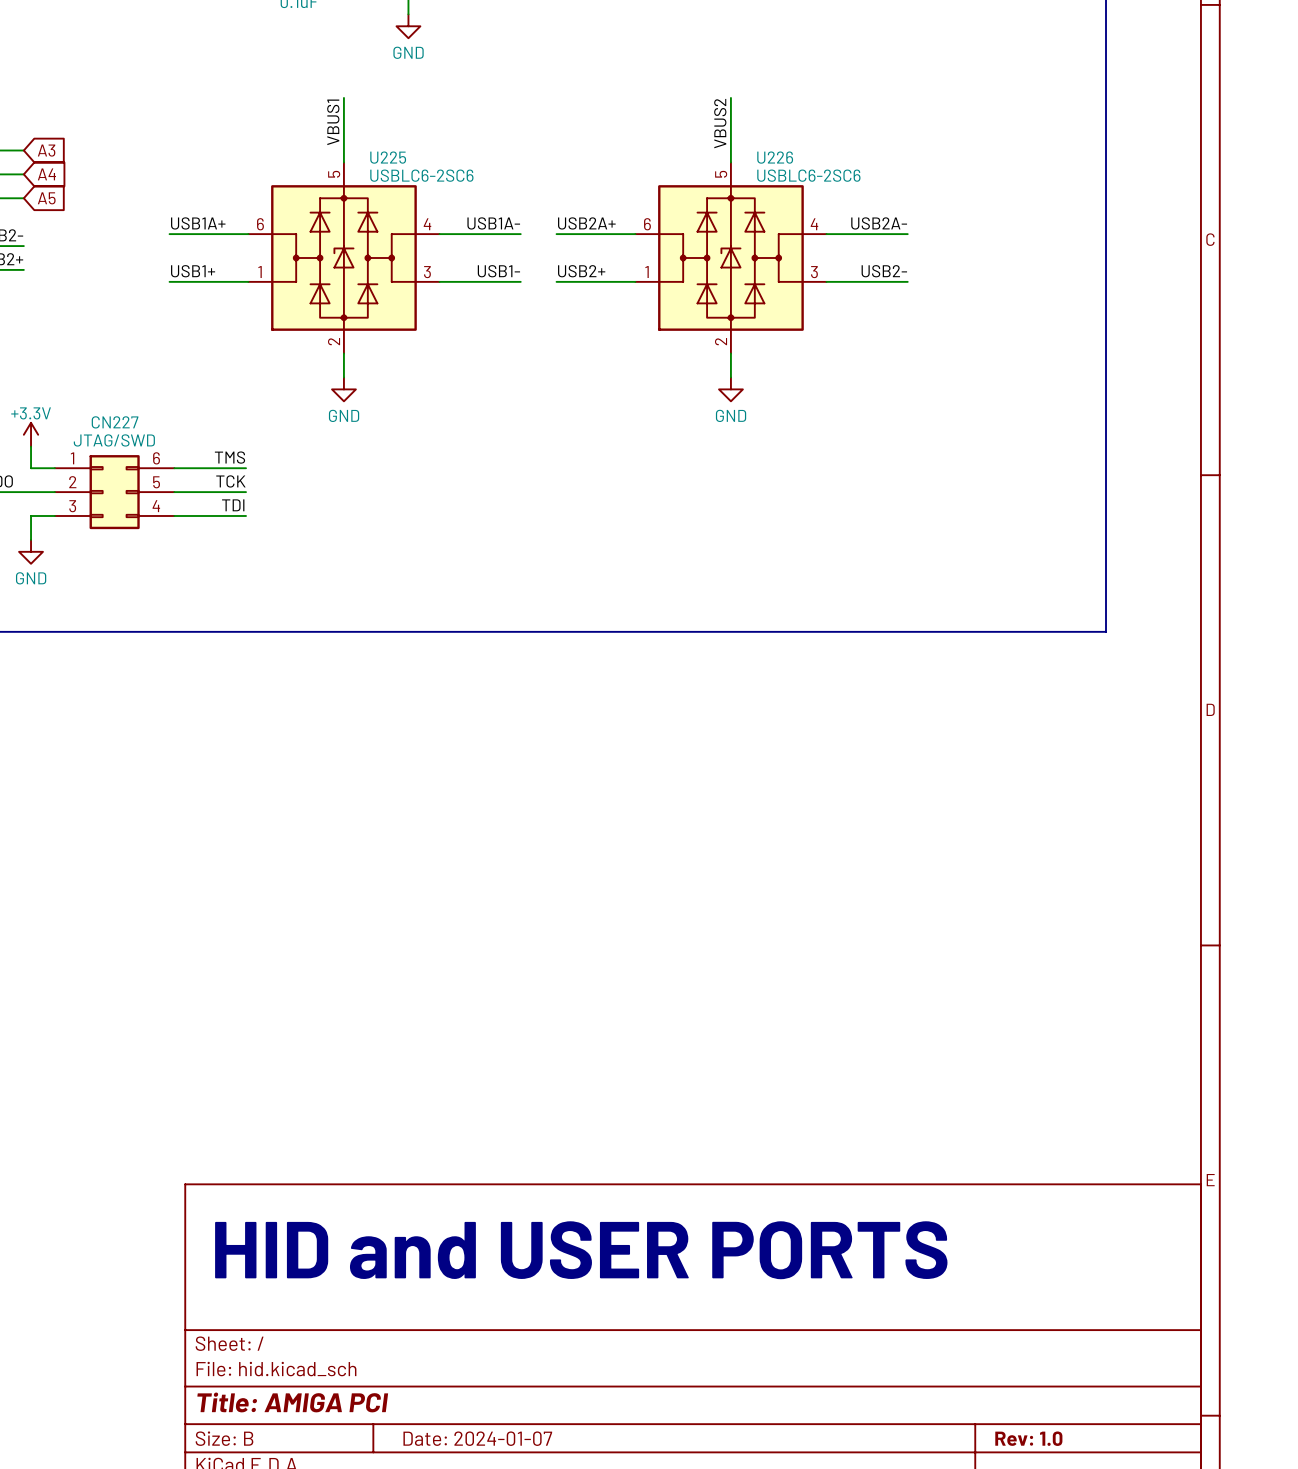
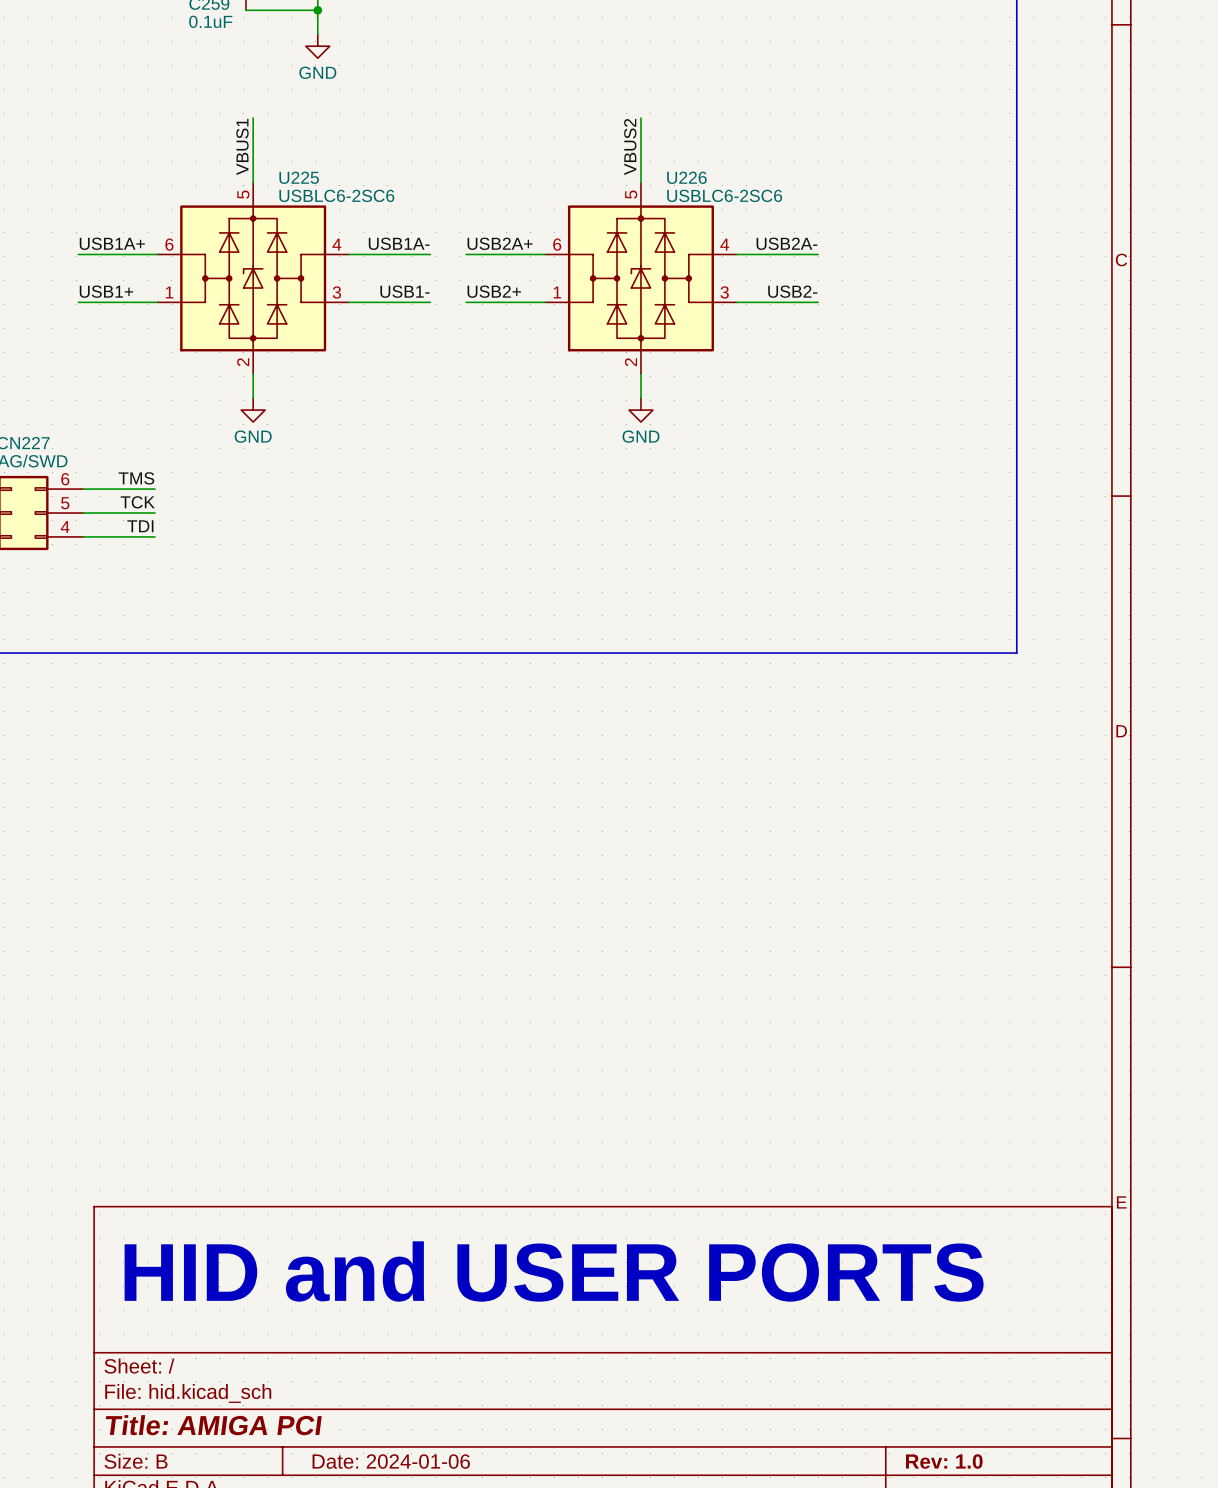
title block: Date: 2024-01-07 (477, 1438) -> Date: 2024-01-06 (391, 1461)

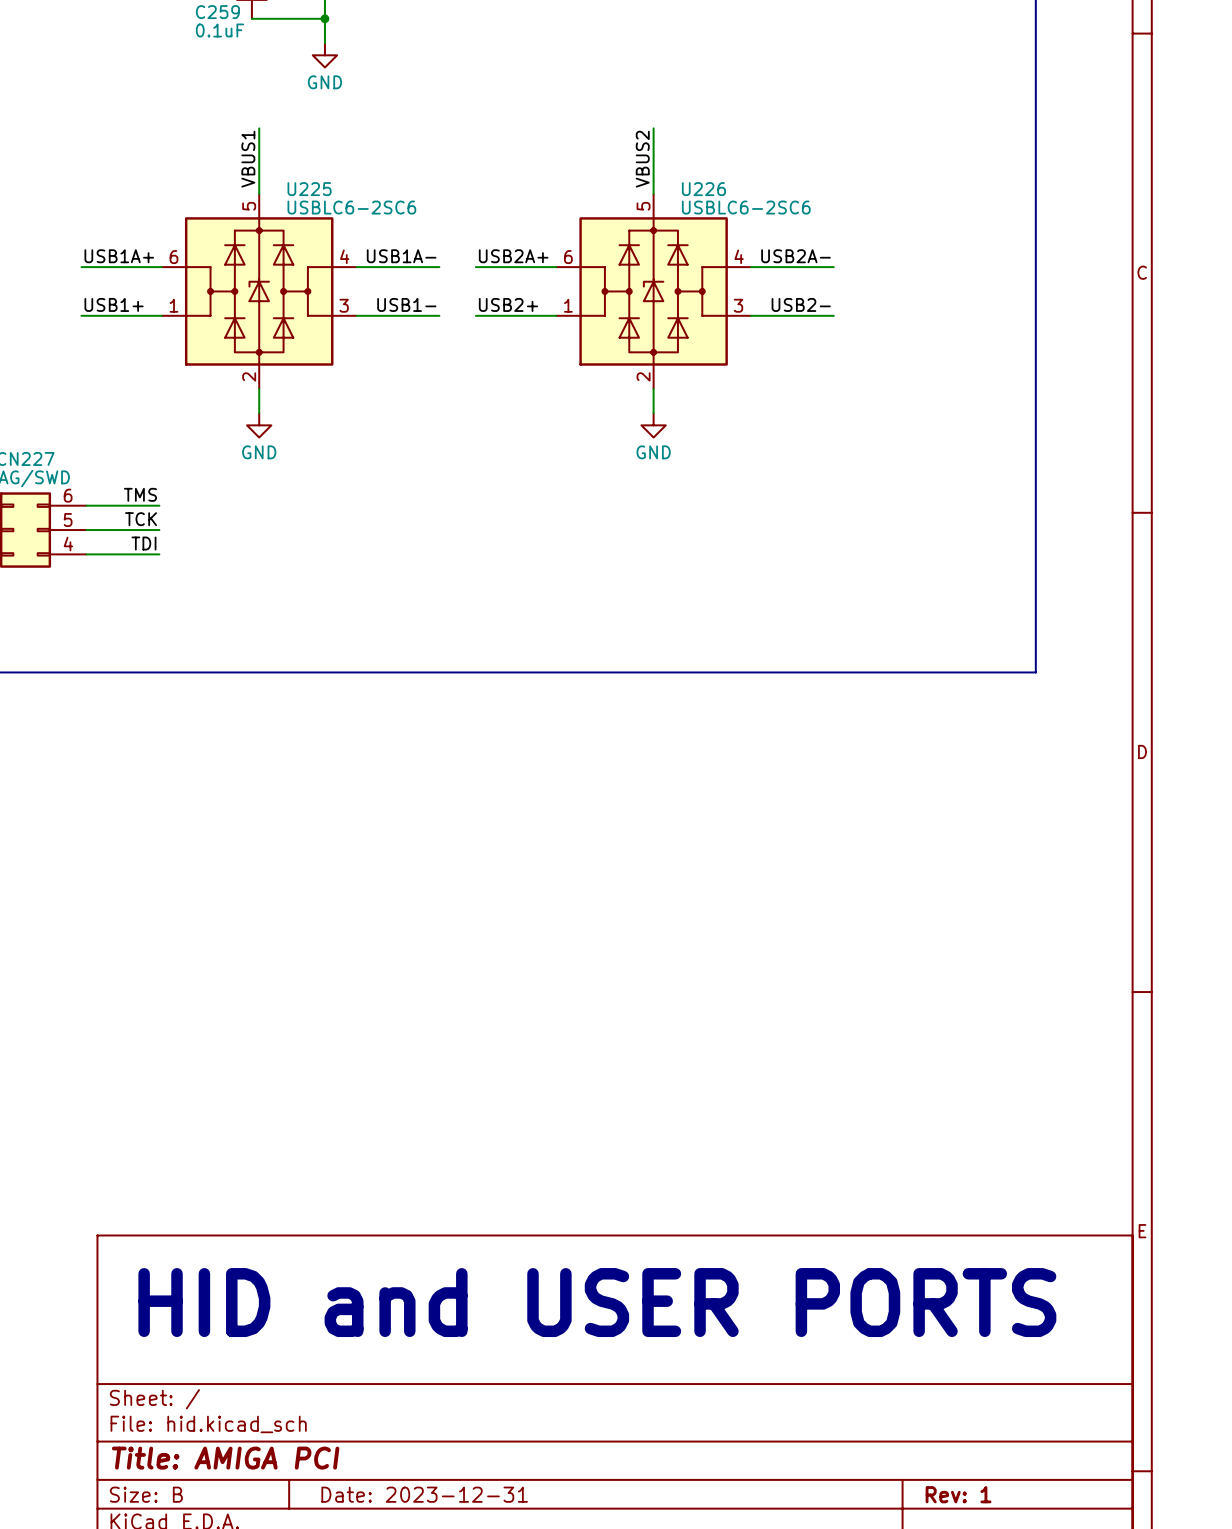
title block: Date: 2024-01-06 (391, 1461) -> Date: 2023-12-31 (424, 1494)
title block: Rev: 1.0 (944, 1461) -> Rev: 1 (958, 1494)

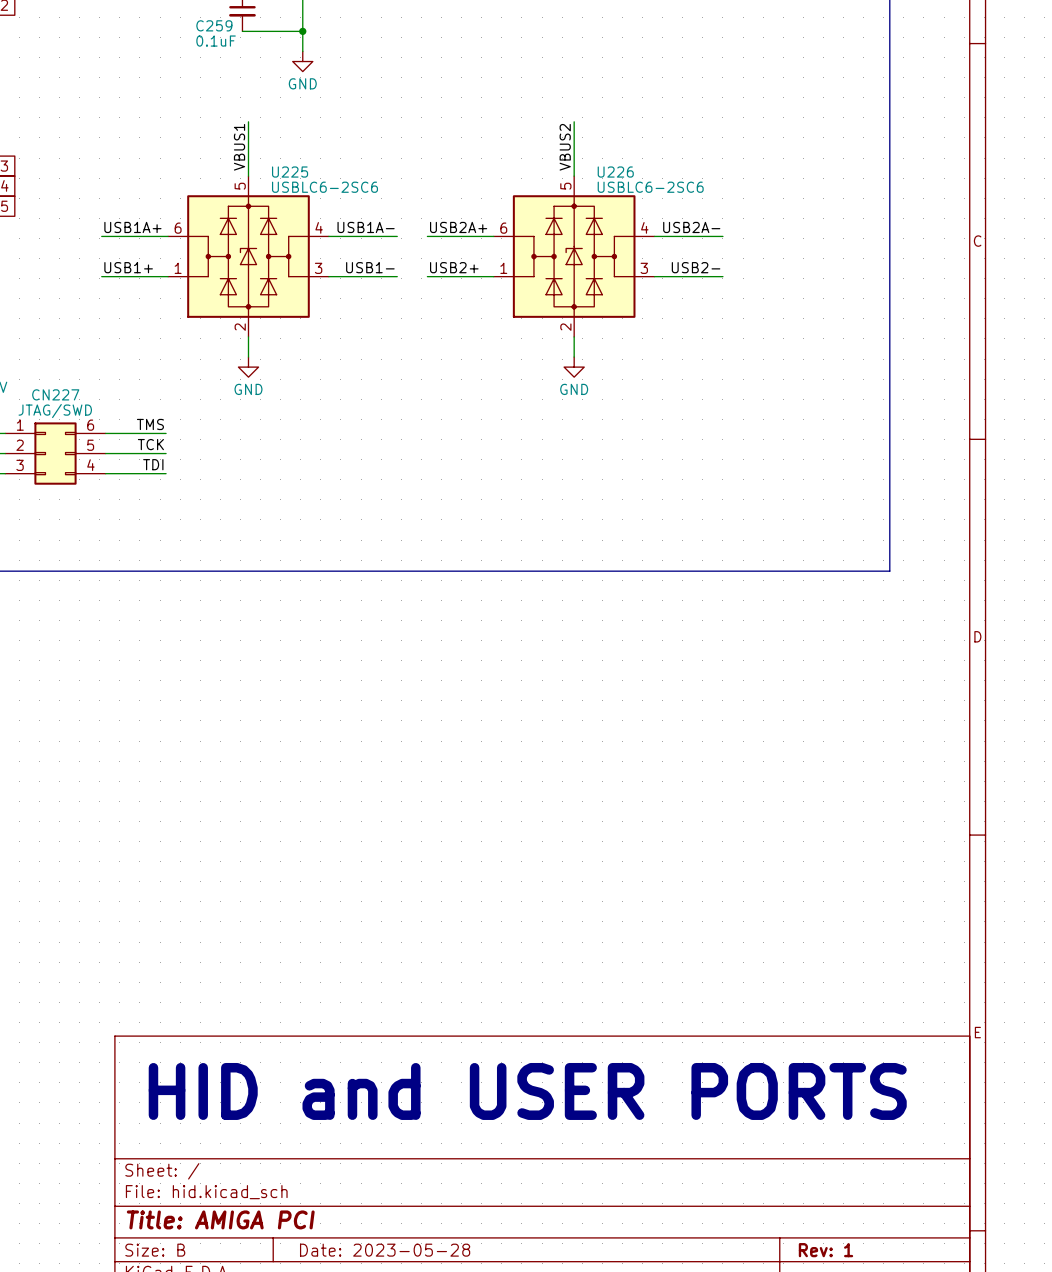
title block: Date: 2023-12-31 (424, 1494) -> Date: 2023-05-28 (385, 1250)

